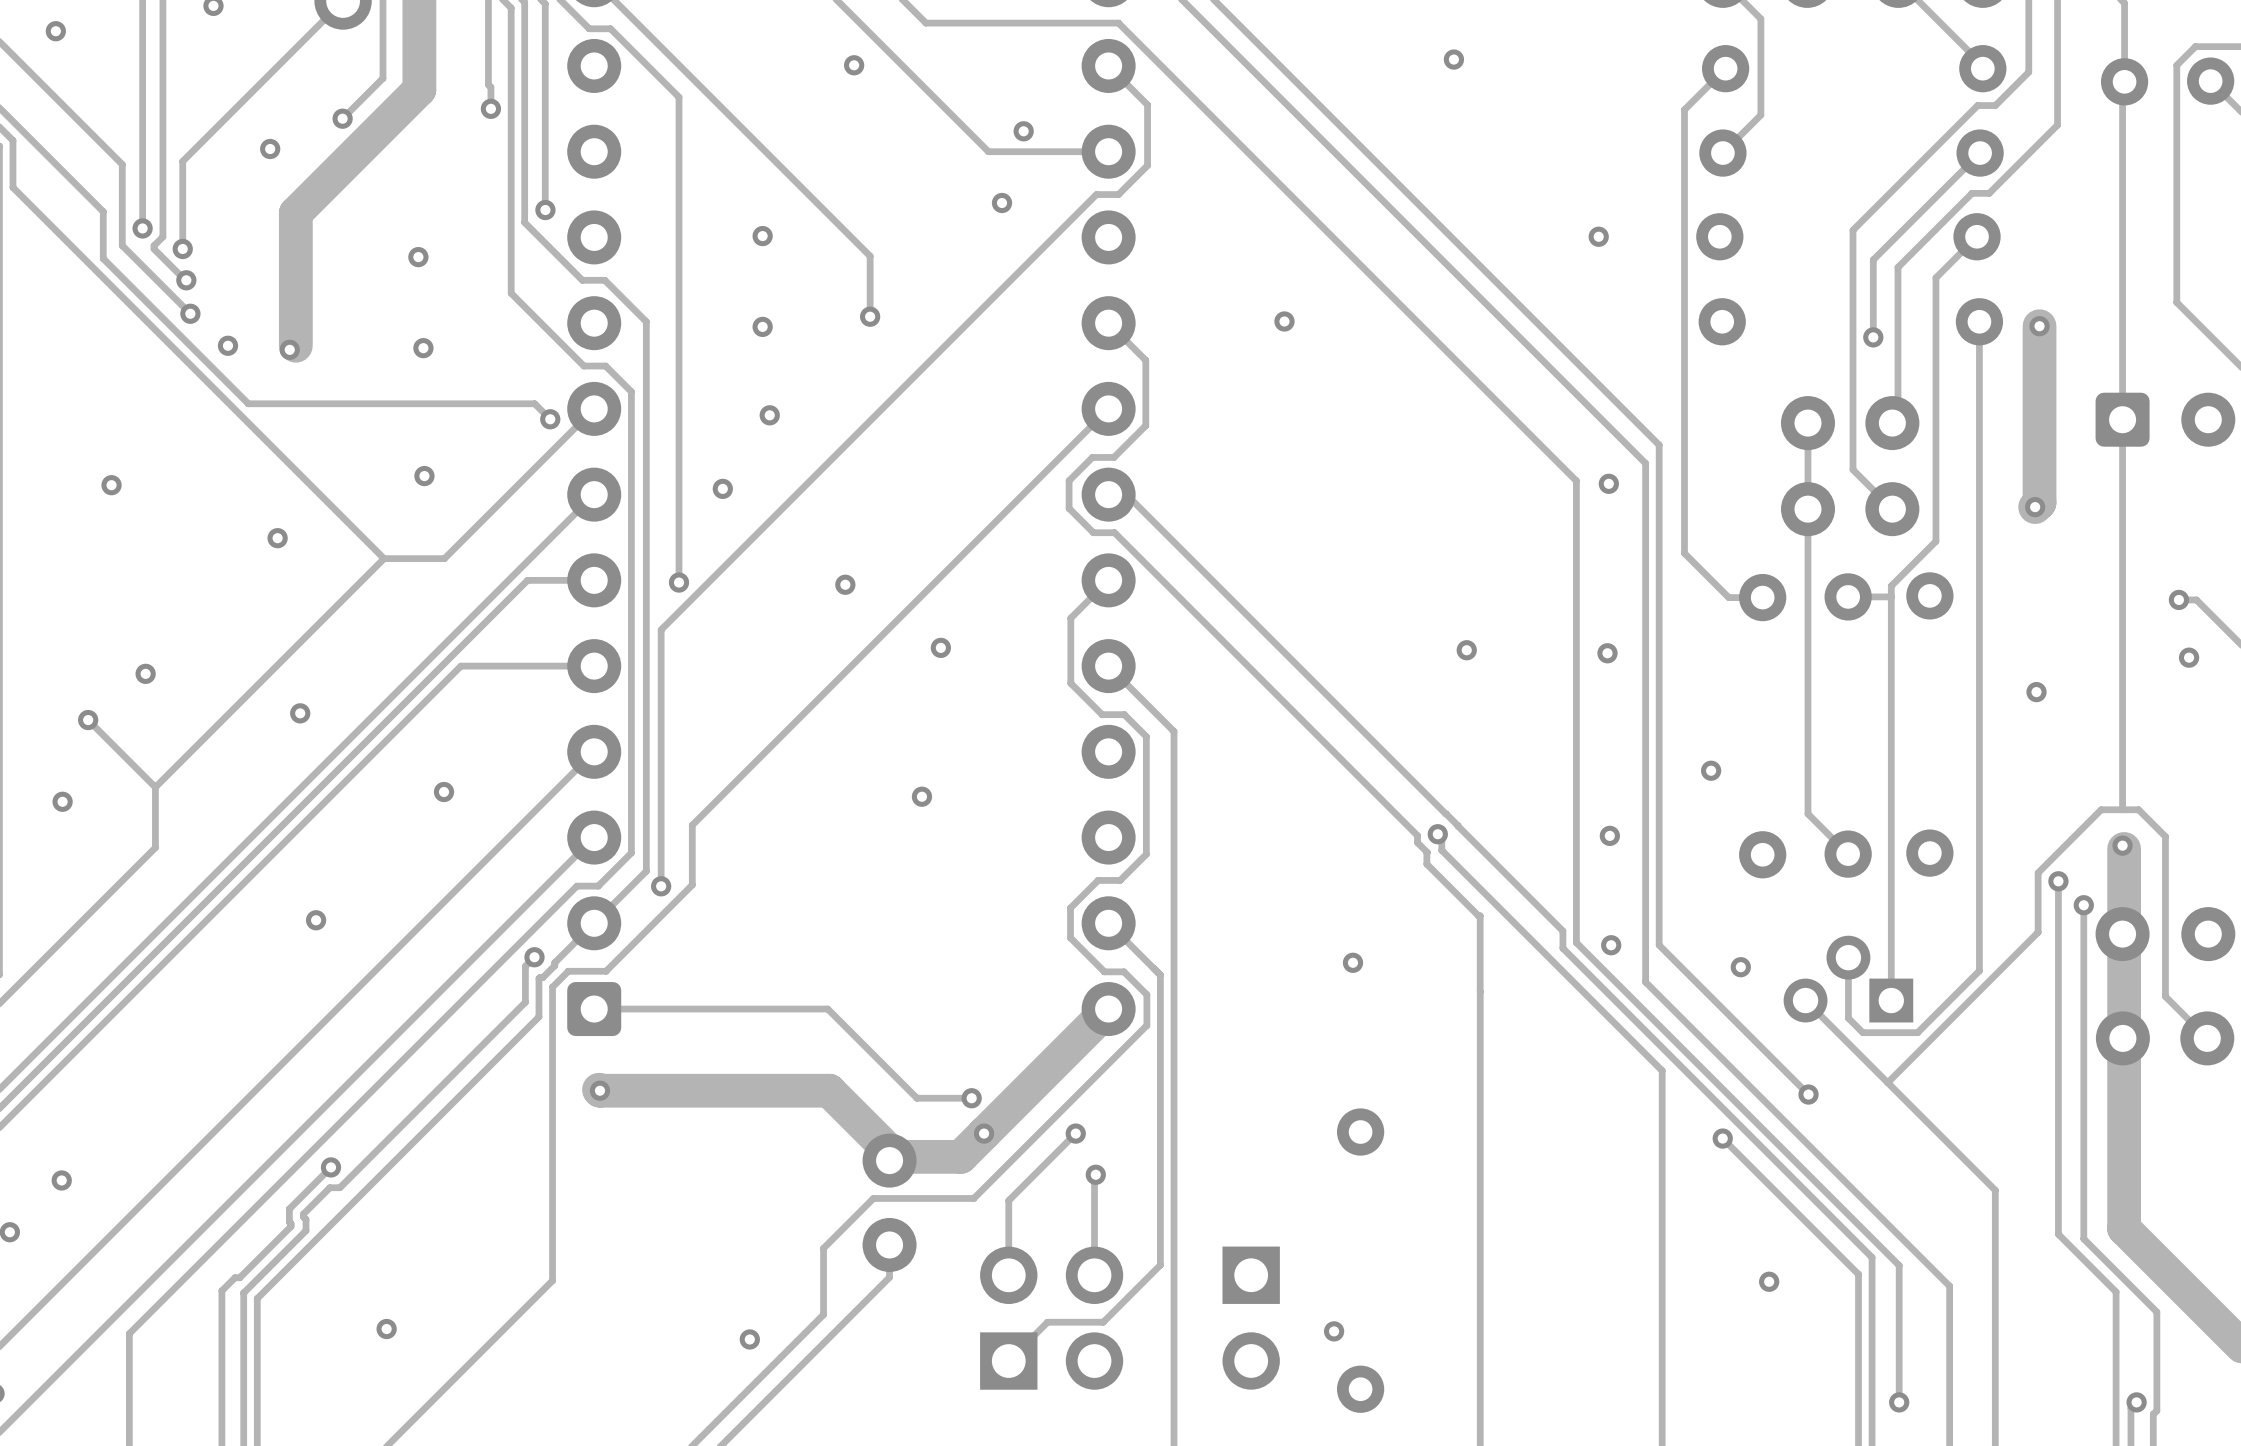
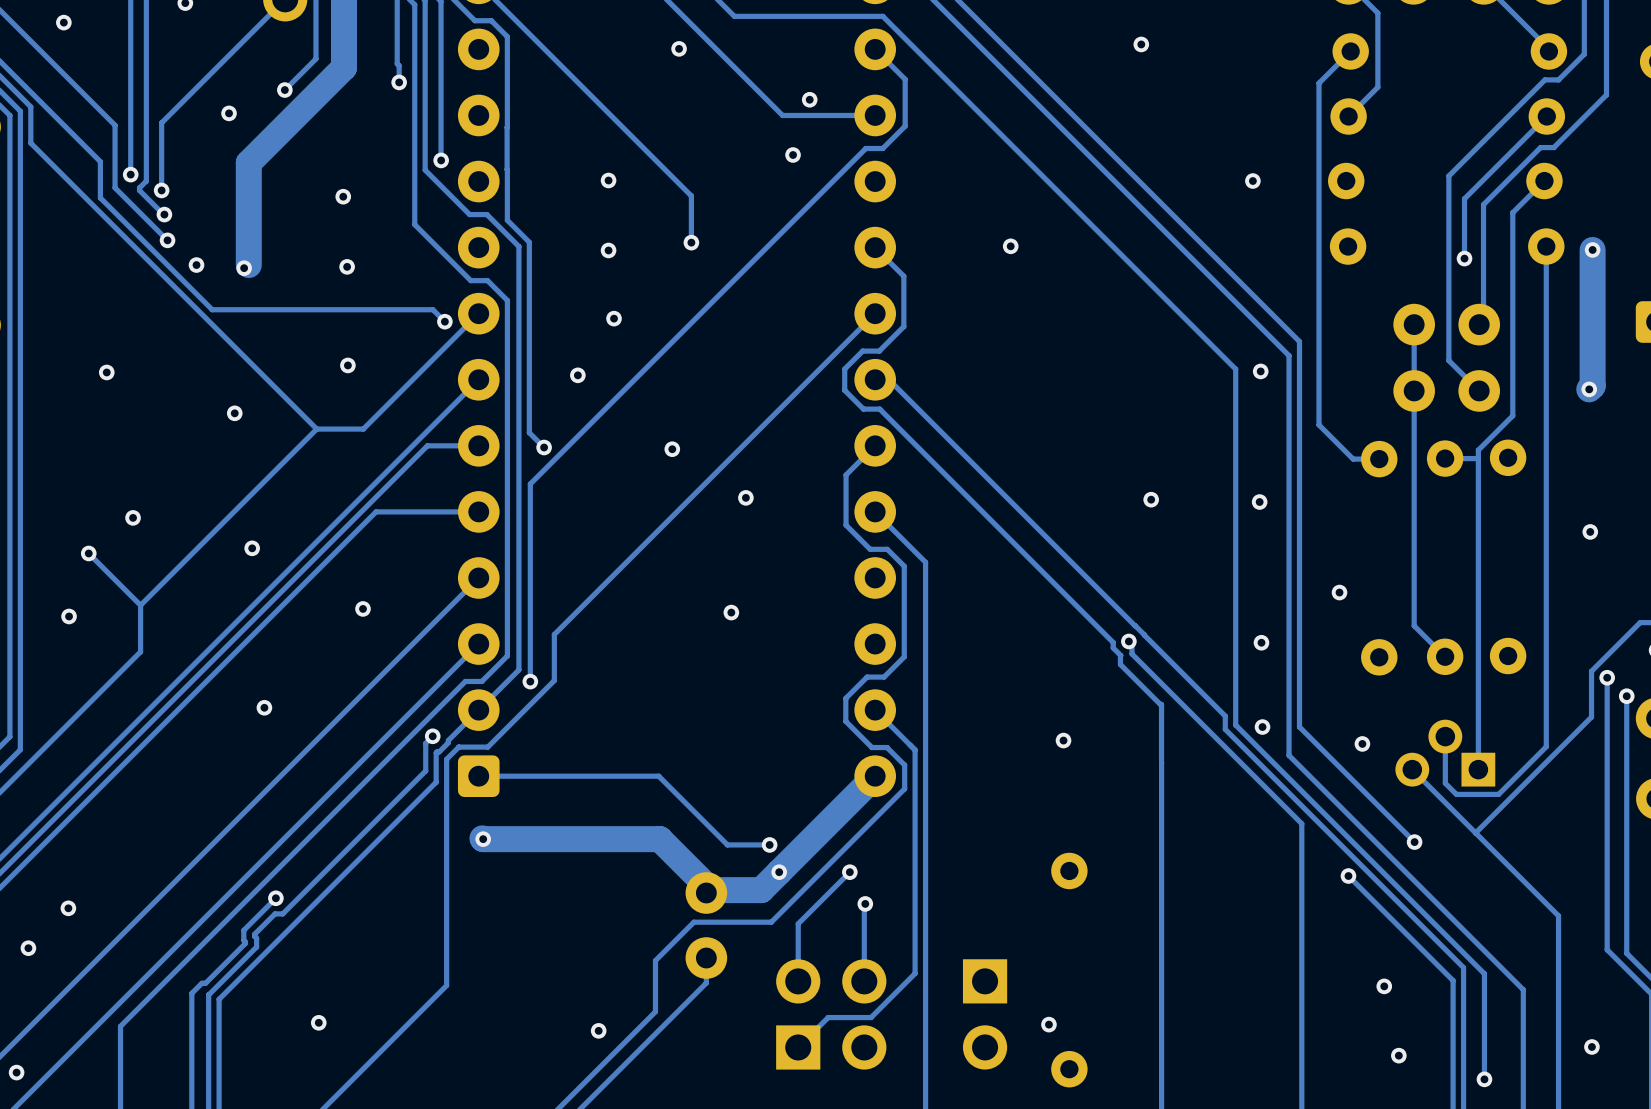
track: (631, 49) (679, 97) (679, 582) -> (507, 169) (507, 220) (529, 242) (529, 432) (544, 447)
track: none -> (507, 36) (507, 127)
track: none -> (507, 127) (507, 169)
via: none -> (1591, 1046)
via: none -> (1398, 1055)

